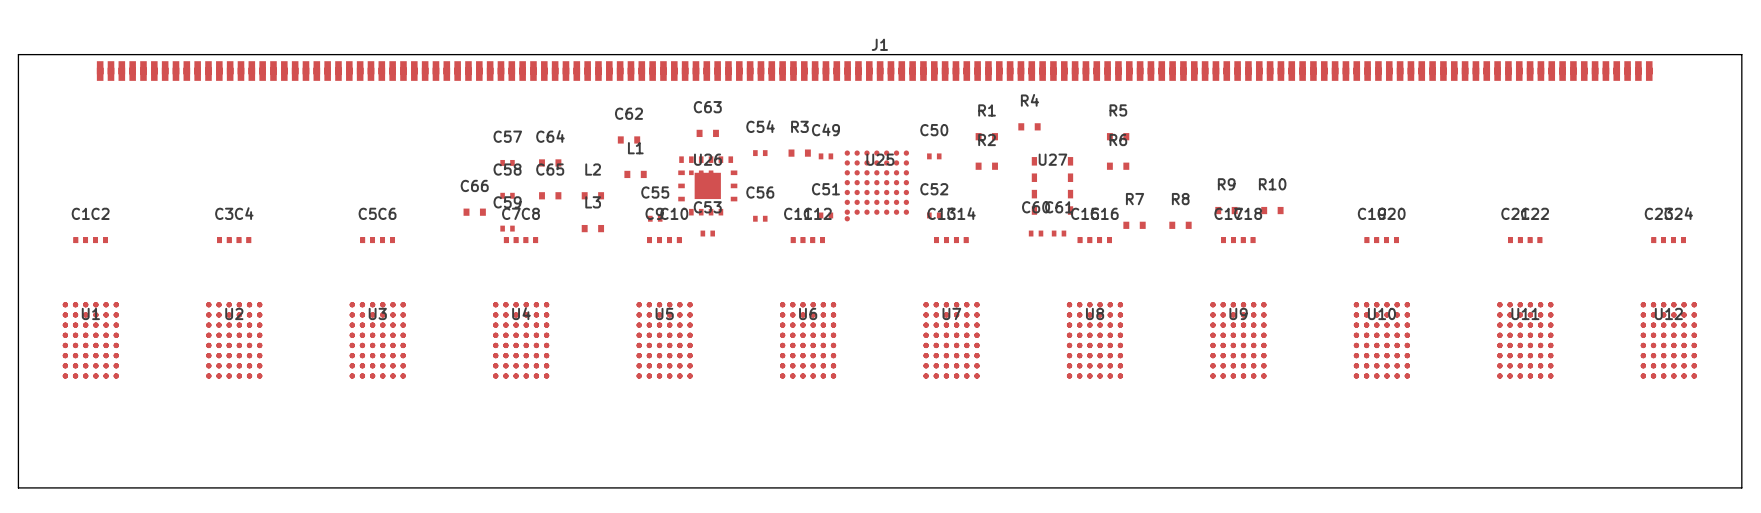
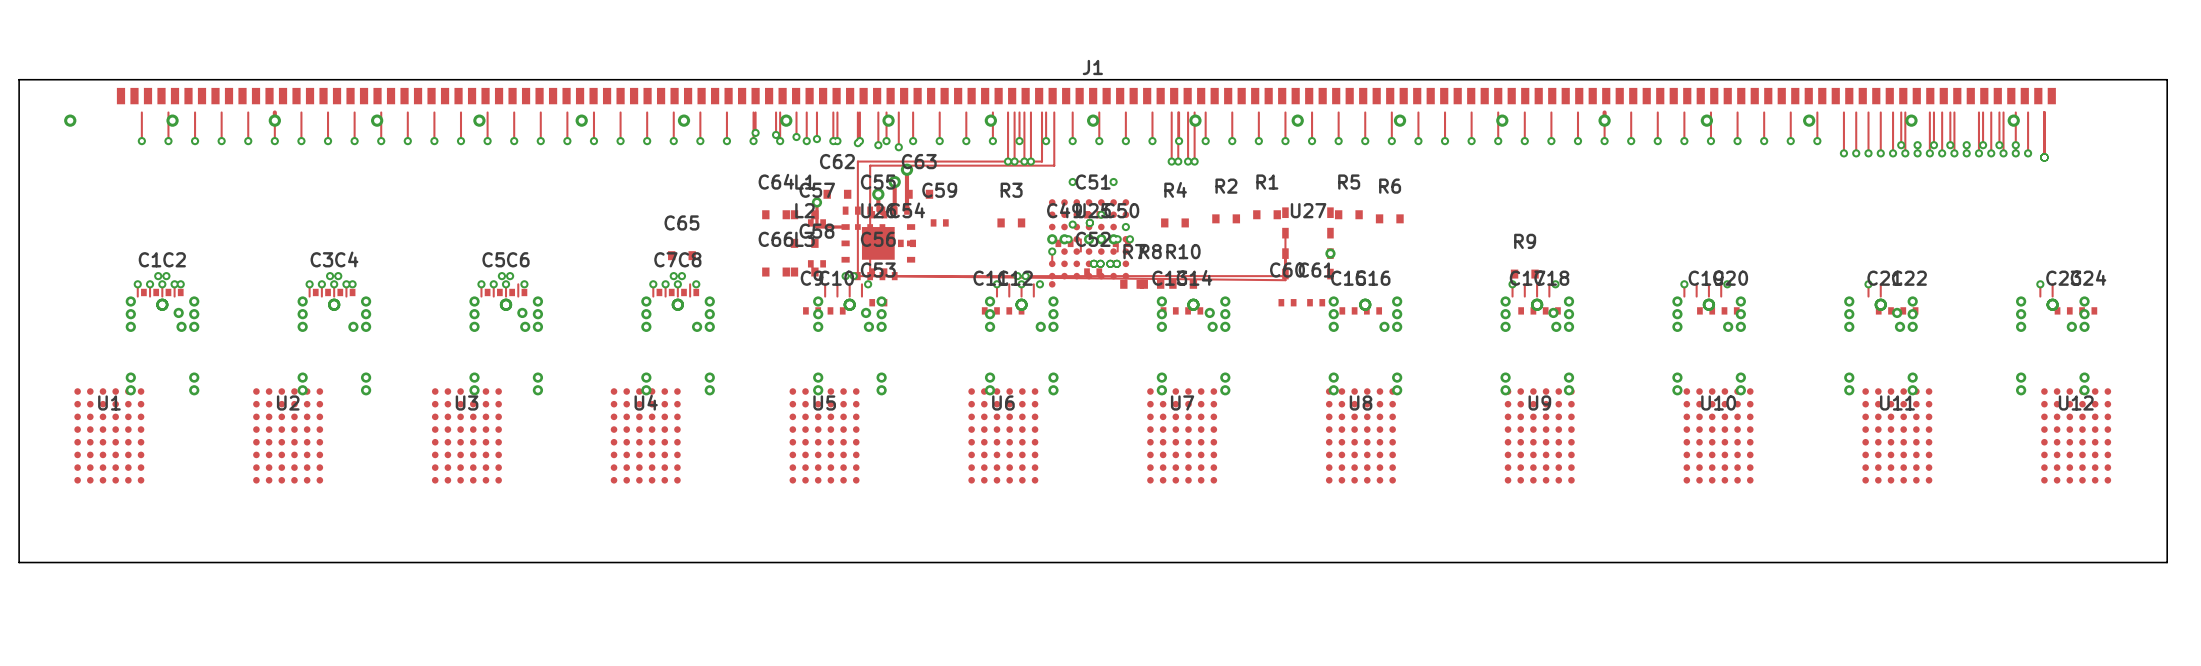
J1 footprint: [96, 61, 1653, 81] -> [116, 87, 2056, 105]
track: none -> (141, 112) (141, 141)
track: none -> (168, 112) (168, 141)
track: none -> (195, 112) (195, 141)
track: none -> (221, 112) (221, 141)
track: none -> (248, 112) (248, 141)
track: none -> (301, 112) (301, 141)
track: none -> (328, 112) (328, 141)
track: none -> (354, 112) (354, 141)
track: none -> (381, 112) (381, 141)
track: none -> (407, 112) (407, 141)
track: none -> (434, 112) (434, 141)
track: none -> (461, 112) (461, 141)
track: none -> (487, 112) (487, 141)
track: none -> (514, 112) (514, 141)
track: none -> (540, 112) (540, 141)
track: none -> (567, 112) (567, 141)
track: none -> (593, 112) (593, 141)
track: none -> (620, 112) (620, 141)
track: none -> (647, 112) (647, 141)
track: none -> (673, 112) (673, 141)
track: none -> (700, 112) (700, 141)
track: none -> (726, 112) (726, 141)
track: none -> (753, 112) (753, 141)
track: none -> (755, 112) (755, 132)
track: none -> (776, 112) (776, 134)
track: none -> (780, 112) (780, 141)
track: none -> (796, 112) (796, 137)
track: none -> (806, 112) (806, 141)
track: none -> (816, 112) (816, 139)
track: none -> (833, 112) (833, 141)
track: none -> (837, 112) (837, 141)
track: none -> (857, 112) (857, 143)
track: none -> (859, 112) (859, 141)
track: none -> (878, 112) (878, 145)
track: none -> (886, 112) (886, 141)
track: none -> (898, 112) (898, 147)
track: none -> (913, 112) (913, 141)
track: none -> (939, 112) (939, 141)
track: none -> (966, 112) (966, 141)
track: none -> (992, 112) (992, 141)
track: none -> (1008, 112) (1008, 161)
track: none -> (1014, 112) (1014, 161)
track: none -> (1019, 112) (1019, 141)
track: none -> (1024, 112) (1024, 161)
track: none -> (1030, 112) (1030, 161)
track: none -> (1042, 112) (1042, 161) (857, 161) (857, 276) (1285, 276)
track: none -> (1046, 112) (1046, 141)
track: none -> (1054, 112) (1054, 165) (870, 165) (870, 276) (1285, 280) (1285, 233)
track: none -> (1072, 112) (1072, 141)
track: none -> (1099, 112) (1099, 141)
track: none -> (1125, 112) (1125, 141)
track: none -> (1152, 112) (1152, 141)
track: none -> (1171, 112) (1171, 161)
track: none -> (1178, 112) (1178, 161)
track: none -> (1179, 112) (1179, 141)
track: none -> (1188, 112) (1188, 161)
track: none -> (1194, 112) (1194, 161)
track: none -> (1205, 112) (1205, 141)
track: none -> (1232, 112) (1232, 141)
track: none -> (1258, 112) (1258, 141)
track: none -> (1285, 112) (1285, 141)
track: none -> (1312, 112) (1312, 141)
track: none -> (1338, 112) (1338, 141)
track: none -> (1365, 112) (1365, 141)
track: none -> (1391, 112) (1391, 141)
track: none -> (1418, 112) (1418, 141)
track: none -> (1445, 112) (1445, 141)
track: none -> (1471, 112) (1471, 141)
track: none -> (1498, 112) (1498, 141)
track: none -> (1524, 112) (1524, 141)
track: none -> (1551, 112) (1551, 141)
track: none -> (1578, 112) (1578, 141)
track: none -> (1631, 112) (1631, 141)
track: none -> (1657, 112) (1657, 141)
track: none -> (1684, 112) (1684, 141)
track: none -> (1710, 112) (1710, 141)
track: none -> (1737, 112) (1737, 141)
track: none -> (1764, 112) (1764, 141)
track: none -> (1790, 112) (1790, 141)
track: none -> (1817, 112) (1817, 141)
track: none -> (1843, 112) (1843, 153)
track: none -> (1856, 112) (1856, 153)
track: none -> (1868, 112) (1868, 153)
track: none -> (1880, 112) (1880, 153)
track: none -> (1893, 112) (1893, 153)
track: none -> (1901, 112) (1901, 145)
track: none -> (1905, 112) (1905, 153)
track: none -> (1929, 112) (1929, 153)
track: none -> (1933, 112) (1933, 145)
track: none -> (1942, 112) (1942, 153)
track: none -> (1950, 112) (1950, 145)
track: none -> (1954, 112) (1954, 153)
track: none -> (1978, 112) (1978, 153)
track: none -> (1983, 112) (1983, 145)
track: none -> (1991, 112) (1991, 153)
track: none -> (1999, 112) (1999, 145)
track: none -> (2003, 112) (2003, 153)
track: none -> (2015, 112) (2015, 153)
track: none -> (2028, 112) (2028, 153)
track: none -> (2044, 112) (2044, 157)
via: none -> (70, 120)
via: none -> (172, 120)
track: none -> (274, 120) (274, 112) (274, 141)
via: none -> (274, 120)
via: none -> (377, 120)
via: none -> (479, 120)
via: none -> (581, 120)
via: none -> (683, 120)
via: none -> (786, 120)
via: none -> (888, 120)
via: none -> (990, 120)
via: none -> (1093, 120)
via: none -> (1195, 120)
via: none -> (1297, 120)
via: none -> (1400, 120)
via: none -> (1502, 120)
track: none -> (1604, 120) (1604, 112) (1604, 141)
via: none -> (1604, 120)
via: none -> (1706, 120)
via: none -> (1809, 120)
via: none -> (1911, 120)
via: none -> (2013, 120)
via: none -> (755, 132)
via: none -> (776, 134)
via: none -> (796, 137)
via: none -> (816, 139)
via: none -> (141, 141)
via: none -> (168, 141)
via: none -> (195, 141)
via: none -> (221, 141)
via: none -> (248, 141)
via: none -> (274, 141)
via: none -> (301, 141)
via: none -> (328, 141)
via: none -> (354, 141)
via: none -> (381, 141)
via: none -> (407, 141)
via: none -> (434, 141)
via: none -> (461, 141)
via: none -> (487, 141)
via: none -> (514, 141)
via: none -> (540, 141)
via: none -> (567, 141)
via: none -> (593, 141)
via: none -> (620, 141)
via: none -> (647, 141)
via: none -> (673, 141)
via: none -> (700, 141)
via: none -> (726, 141)
via: none -> (753, 141)
via: none -> (780, 141)
via: none -> (806, 141)
via: none -> (833, 141)
via: none -> (837, 141)
via: none -> (859, 141)
via: none -> (886, 141)
via: none -> (913, 141)
via: none -> (939, 141)
via: none -> (966, 141)
via: none -> (992, 141)
via: none -> (1019, 141)
via: none -> (1046, 141)
via: none -> (1072, 141)
via: none -> (1099, 141)
via: none -> (1125, 141)
via: none -> (1152, 141)
via: none -> (1179, 141)
via: none -> (1205, 141)
via: none -> (1232, 141)
via: none -> (1258, 141)
via: none -> (1285, 141)
via: none -> (1312, 141)
via: none -> (1338, 141)
via: none -> (1365, 141)
via: none -> (1391, 141)
via: none -> (1418, 141)
via: none -> (1445, 141)
via: none -> (1471, 141)
via: none -> (1498, 141)
via: none -> (1524, 141)
via: none -> (1551, 141)
via: none -> (1578, 141)
via: none -> (1604, 141)
via: none -> (1631, 141)
via: none -> (1657, 141)
via: none -> (1684, 141)
via: none -> (1710, 141)
via: none -> (1737, 141)
via: none -> (1764, 141)
via: none -> (1790, 141)
via: none -> (1817, 141)
via: none -> (857, 143)
via: none -> (878, 145)
via: none -> (1901, 145)
via: none -> (1917, 145)
via: none -> (1933, 145)
via: none -> (1950, 145)
via: none -> (1966, 145)
via: none -> (1983, 145)
via: none -> (1999, 145)
via: none -> (2015, 145)
via: none -> (898, 147)
via: none -> (1843, 153)
via: none -> (1856, 153)
via: none -> (1868, 153)
via: none -> (1880, 153)
via: none -> (1893, 153)
via: none -> (1905, 153)
via: none -> (1917, 153)
via: none -> (1929, 153)
via: none -> (1942, 153)
via: none -> (1954, 153)
via: none -> (1966, 153)
via: none -> (1978, 153)
via: none -> (1991, 153)
via: none -> (2003, 153)
via: none -> (2015, 153)
via: none -> (2028, 153)
via: none -> (2044, 157)
via: none -> (1008, 161)
via: none -> (1014, 161)
via: none -> (1024, 161)
via: none -> (1030, 161)
via: none -> (1171, 161)
via: none -> (1178, 161)
via: none -> (1188, 161)
via: none -> (1194, 161)
track: none -> (906, 169) (906, 210)
via: none -> (906, 169)
R4 position: (1029, 126) -> (1174, 222)
C63 position: (707, 133) -> (919, 194)
track: none -> (894, 182) (894, 210)
via: none -> (894, 182)
via: none -> (1072, 182)
via: none -> (1113, 182)
R1 position: (986, 136) -> (1267, 214)
R5 position: (1118, 136) -> (1348, 214)
C62 position: (628, 139) -> (837, 194)
track: none -> (878, 194) (878, 210)
via: none -> (878, 194)
track: none -> (816, 202) (816, 227) (845, 227)
via: none -> (816, 202)
C54 position: (760, 153) -> (906, 243)
R3 position: (799, 153) -> (1011, 222)
C49 position: (825, 156) -> (1064, 243)
C50 position: (934, 156) -> (1121, 243)
C57 position: (507, 162) -> (816, 222)
C64 position: (550, 162) -> (776, 214)
via: none -> (1101, 214)
via: none -> (1089, 222)
via: none -> (1072, 224)
via: none -> (1125, 227)
L1 position: (635, 174) -> (804, 214)
via: none -> (1052, 239)
via: none -> (1064, 239)
via: none -> (1068, 239)
track: none -> (1080, 239) (1080, 251)
via: none -> (1089, 239)
via: none -> (1101, 239)
via: none -> (1113, 239)
track: none -> (1117, 239) (1117, 251)
via: none -> (1117, 239)
via: none -> (1129, 239)
track: none -> (1052, 251) (1052, 263)
via: none -> (1052, 251)
via: none -> (1330, 253)
C58 position: (507, 195) -> (816, 263)
L2 position: (592, 195) -> (804, 243)
via: none -> (1093, 263)
via: none -> (1100, 263)
via: none -> (1110, 263)
via: none -> (1116, 263)
R10 position: (1272, 210) -> (1183, 284)
via: none -> (158, 276)
via: none -> (166, 276)
via: none -> (330, 276)
via: none -> (338, 276)
via: none -> (501, 276)
via: none -> (510, 276)
C66 position: (474, 212) -> (776, 272)
via: none -> (673, 276)
via: none -> (681, 276)
via: none -> (845, 276)
via: none -> (853, 276)
via: none -> (1017, 276)
via: none -> (1025, 276)
C51 position: (825, 215) -> (1093, 214)
C52 position: (934, 215) -> (1093, 272)
track: none -> (137, 284) (137, 296)
via: none -> (137, 284)
track: none -> (150, 284) (150, 296)
via: none -> (150, 284)
track: none -> (162, 284) (162, 296)
via: none -> (162, 284)
track: none -> (174, 284) (174, 296)
via: none -> (174, 284)
via: none -> (180, 284)
track: none -> (309, 284) (309, 296)
via: none -> (309, 284)
track: none -> (321, 284) (321, 296)
via: none -> (321, 284)
track: none -> (334, 284) (334, 296)
via: none -> (334, 284)
track: none -> (346, 284) (346, 296)
via: none -> (346, 284)
via: none -> (352, 284)
track: none -> (481, 284) (481, 296)
via: none -> (481, 284)
track: none -> (493, 284) (493, 296)
via: none -> (493, 284)
track: none -> (506, 284) (506, 296)
via: none -> (506, 284)
track: none -> (518, 284) (518, 296)
via: none -> (524, 284)
track: none -> (653, 284) (653, 296)
via: none -> (653, 284)
track: none -> (665, 284) (665, 296)
via: none -> (665, 284)
track: none -> (677, 284) (677, 296)
via: none -> (677, 284)
track: none -> (690, 284) (690, 296)
via: none -> (696, 284)
C55 position: (655, 218) -> (878, 214)
track: none -> (825, 284) (825, 296)
track: none -> (837, 284) (837, 296)
track: none -> (849, 284) (849, 296)
track: none -> (861, 284) (861, 296)
via: none -> (868, 284)
C56 position: (760, 218) -> (878, 272)
track: none -> (996, 284) (996, 296)
via: none -> (996, 284)
track: none -> (1009, 284) (1009, 296)
track: none -> (1021, 284) (1021, 296)
via: none -> (1021, 284)
track: none -> (1033, 284) (1033, 296)
via: none -> (1039, 284)
track: none -> (1512, 284) (1512, 296)
via: none -> (1512, 284)
track: none -> (1524, 284) (1524, 296)
track: none -> (1537, 284) (1537, 296)
track: none -> (1549, 284) (1549, 296)
via: none -> (1555, 284)
track: none -> (1684, 284) (1684, 296)
via: none -> (1684, 284)
track: none -> (1696, 284) (1696, 296)
track: none -> (1708, 284) (1708, 296)
track: none -> (1721, 284) (1721, 296)
via: none -> (1727, 284)
track: none -> (1868, 284) (1868, 296)
via: none -> (1868, 284)
track: none -> (1880, 284) (1880, 296)
track: none -> (2040, 284) (2040, 296)
via: none -> (2040, 284)
track: none -> (2052, 284) (2052, 296)
R7 position: (1134, 225) -> (1134, 284)
R8 position: (1180, 225) -> (1150, 284)
C59 position: (507, 228) -> (939, 222)
L3 position: (592, 228) -> (804, 272)
via: none -> (130, 301)
via: none -> (194, 301)
via: none -> (302, 301)
via: none -> (366, 301)
via: none -> (474, 301)
via: none -> (537, 301)
via: none -> (646, 301)
via: none -> (709, 301)
via: none -> (818, 301)
via: none -> (881, 301)
via: none -> (990, 301)
via: none -> (1053, 301)
via: none -> (1161, 301)
via: none -> (1225, 301)
via: none -> (1333, 301)
via: none -> (1397, 301)
via: none -> (1505, 301)
via: none -> (1568, 301)
via: none -> (1677, 301)
via: none -> (1740, 301)
via: none -> (1849, 301)
via: none -> (1912, 301)
via: none -> (2021, 301)
via: none -> (2084, 301)
via: none -> (162, 304)
via: none -> (334, 304)
via: none -> (506, 304)
via: none -> (677, 304)
via: none -> (849, 304)
via: none -> (1021, 304)
via: none -> (1193, 304)
via: none -> (1365, 304)
via: none -> (1537, 304)
via: none -> (1708, 304)
via: none -> (1880, 304)
via: none -> (2052, 304)
C1 position: (80, 240) -> (150, 292)
part: (80, 240) -> none
C2 position: (100, 240) -> (174, 292)
part: (100, 240) -> none
C3 position: (224, 240) -> (321, 292)
part: (224, 240) -> none
C4 position: (243, 240) -> (346, 292)
part: (243, 240) -> none
C5 position: (367, 240) -> (493, 292)
part: (367, 240) -> none
C6 position: (387, 240) -> (518, 292)
part: (387, 240) -> none
C7 position: (511, 240) -> (665, 292)
part: (511, 240) -> none
C8 position: (530, 240) -> (690, 292)
part: (530, 240) -> none
part: (654, 240) -> none
part: (674, 240) -> none
part: (798, 240) -> none
part: (817, 240) -> none
part: (941, 240) -> none
part: (961, 240) -> none
part: (1084, 240) -> none
part: (1104, 240) -> none
part: (1228, 240) -> none
part: (1248, 240) -> none
part: (1371, 240) -> none
part: (1391, 240) -> none
part: (1515, 240) -> none
part: (1535, 240) -> none
part: (1658, 240) -> none
part: (1678, 240) -> none
via: none -> (178, 312)
via: none -> (522, 312)
via: none -> (866, 312)
via: none -> (1209, 312)
via: none -> (1553, 312)
via: none -> (1897, 312)
via: none -> (130, 314)
via: none -> (194, 314)
via: none -> (302, 314)
via: none -> (366, 314)
via: none -> (474, 314)
via: none -> (537, 314)
via: none -> (646, 314)
via: none -> (709, 314)
via: none -> (818, 314)
via: none -> (881, 314)
via: none -> (990, 314)
via: none -> (1053, 314)
via: none -> (1161, 314)
via: none -> (1225, 314)
via: none -> (1333, 314)
via: none -> (1397, 314)
via: none -> (1505, 314)
via: none -> (1568, 314)
via: none -> (1677, 314)
via: none -> (1740, 314)
via: none -> (1849, 314)
via: none -> (1912, 314)
via: none -> (2021, 314)
via: none -> (2084, 314)
via: none -> (130, 326)
via: none -> (181, 326)
via: none -> (194, 326)
via: none -> (302, 326)
via: none -> (353, 326)
via: none -> (366, 326)
via: none -> (474, 326)
via: none -> (525, 326)
via: none -> (537, 326)
via: none -> (646, 326)
via: none -> (697, 326)
via: none -> (709, 326)
via: none -> (818, 326)
via: none -> (868, 326)
via: none -> (881, 326)
via: none -> (990, 326)
via: none -> (1040, 326)
via: none -> (1053, 326)
via: none -> (1161, 326)
via: none -> (1212, 326)
via: none -> (1225, 326)
via: none -> (1333, 326)
via: none -> (1384, 326)
via: none -> (1397, 326)
via: none -> (1505, 326)
via: none -> (1556, 326)
via: none -> (1568, 326)
via: none -> (1677, 326)
via: none -> (1728, 326)
via: none -> (1740, 326)
via: none -> (1849, 326)
via: none -> (1900, 326)
via: none -> (1912, 326)
via: none -> (2021, 326)
via: none -> (2071, 326)
via: none -> (2084, 326)
via: none -> (130, 377)
via: none -> (194, 377)
via: none -> (302, 377)
via: none -> (366, 377)
via: none -> (474, 377)
via: none -> (537, 377)
via: none -> (646, 377)
via: none -> (709, 377)
via: none -> (818, 377)
via: none -> (881, 377)
via: none -> (990, 377)
via: none -> (1053, 377)
via: none -> (1161, 377)
via: none -> (1225, 377)
via: none -> (1333, 377)
via: none -> (1397, 377)
via: none -> (1505, 377)
via: none -> (1568, 377)
via: none -> (1677, 377)
via: none -> (1740, 377)
via: none -> (1849, 377)
via: none -> (1912, 377)
via: none -> (2021, 377)
via: none -> (2084, 377)
via: none -> (130, 390)
via: none -> (194, 390)
via: none -> (302, 390)
via: none -> (366, 390)
via: none -> (474, 390)
via: none -> (537, 390)
via: none -> (646, 390)
via: none -> (709, 390)
via: none -> (818, 390)
via: none -> (881, 390)
via: none -> (990, 390)
via: none -> (1053, 390)
via: none -> (1161, 390)
via: none -> (1225, 390)
via: none -> (1333, 390)
via: none -> (1397, 390)
via: none -> (1505, 390)
via: none -> (1568, 390)
via: none -> (1677, 390)
via: none -> (1740, 390)
via: none -> (1849, 390)
via: none -> (1912, 390)
via: none -> (2021, 390)
via: none -> (2084, 390)
part: (90, 340) -> none
part: (234, 340) -> none
part: (377, 340) -> none
part: (521, 340) -> none
part: (664, 340) -> none
part: (808, 340) -> none
part: (951, 340) -> none
part: (1094, 340) -> none
part: (1238, 340) -> none
part: (1381, 340) -> none
part: (1525, 340) -> none
part: (1668, 340) -> none
board edge: (18, 441) (18, 487) (1741, 487) (1741, 441) -> (19, 562) (2167, 562)

